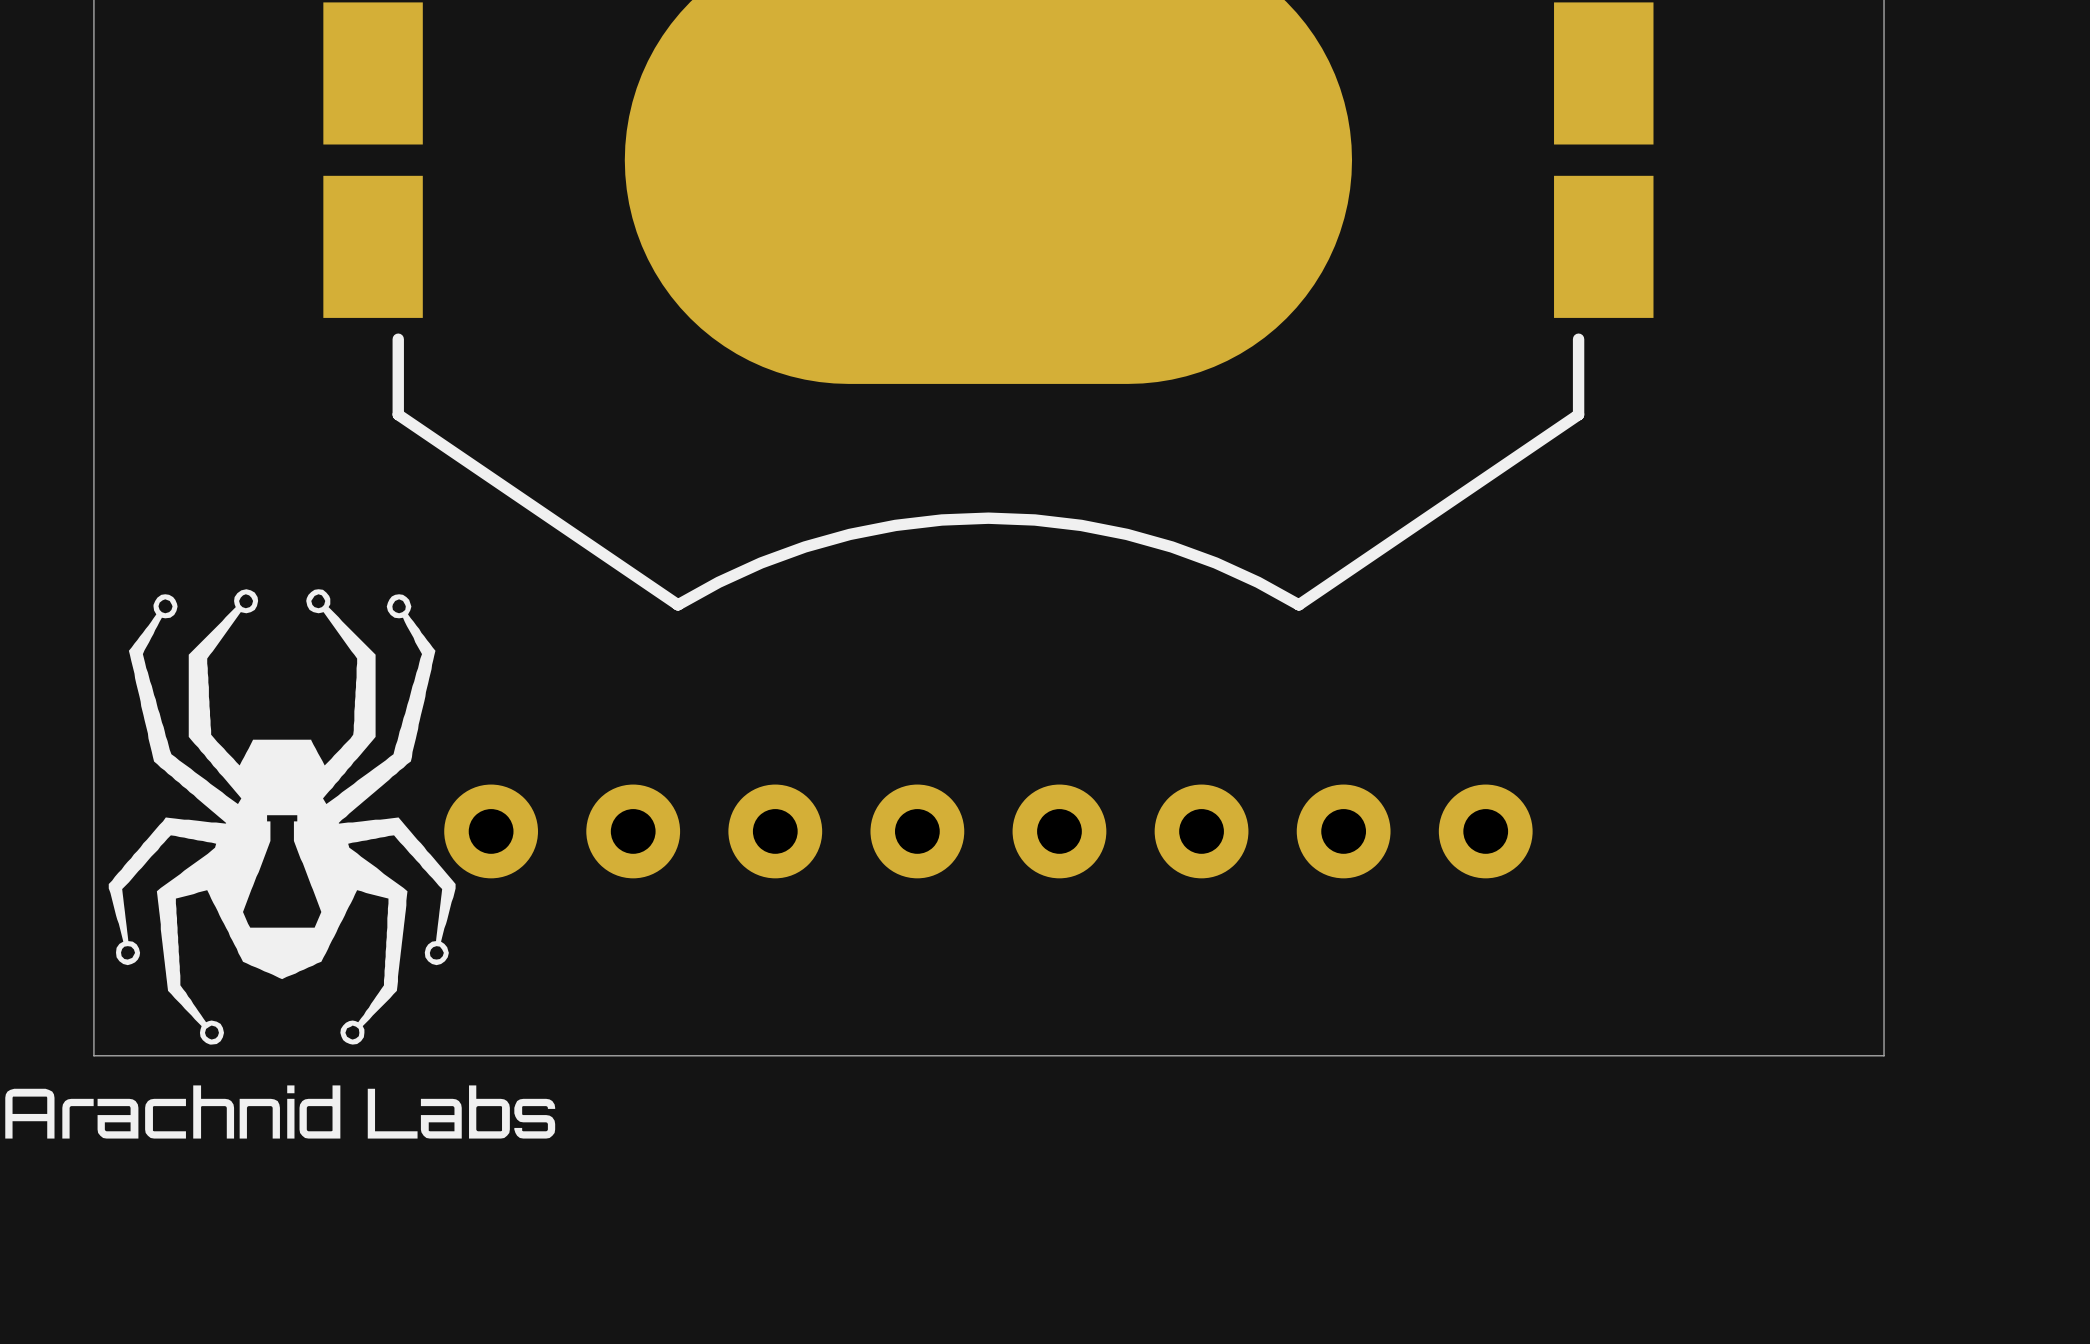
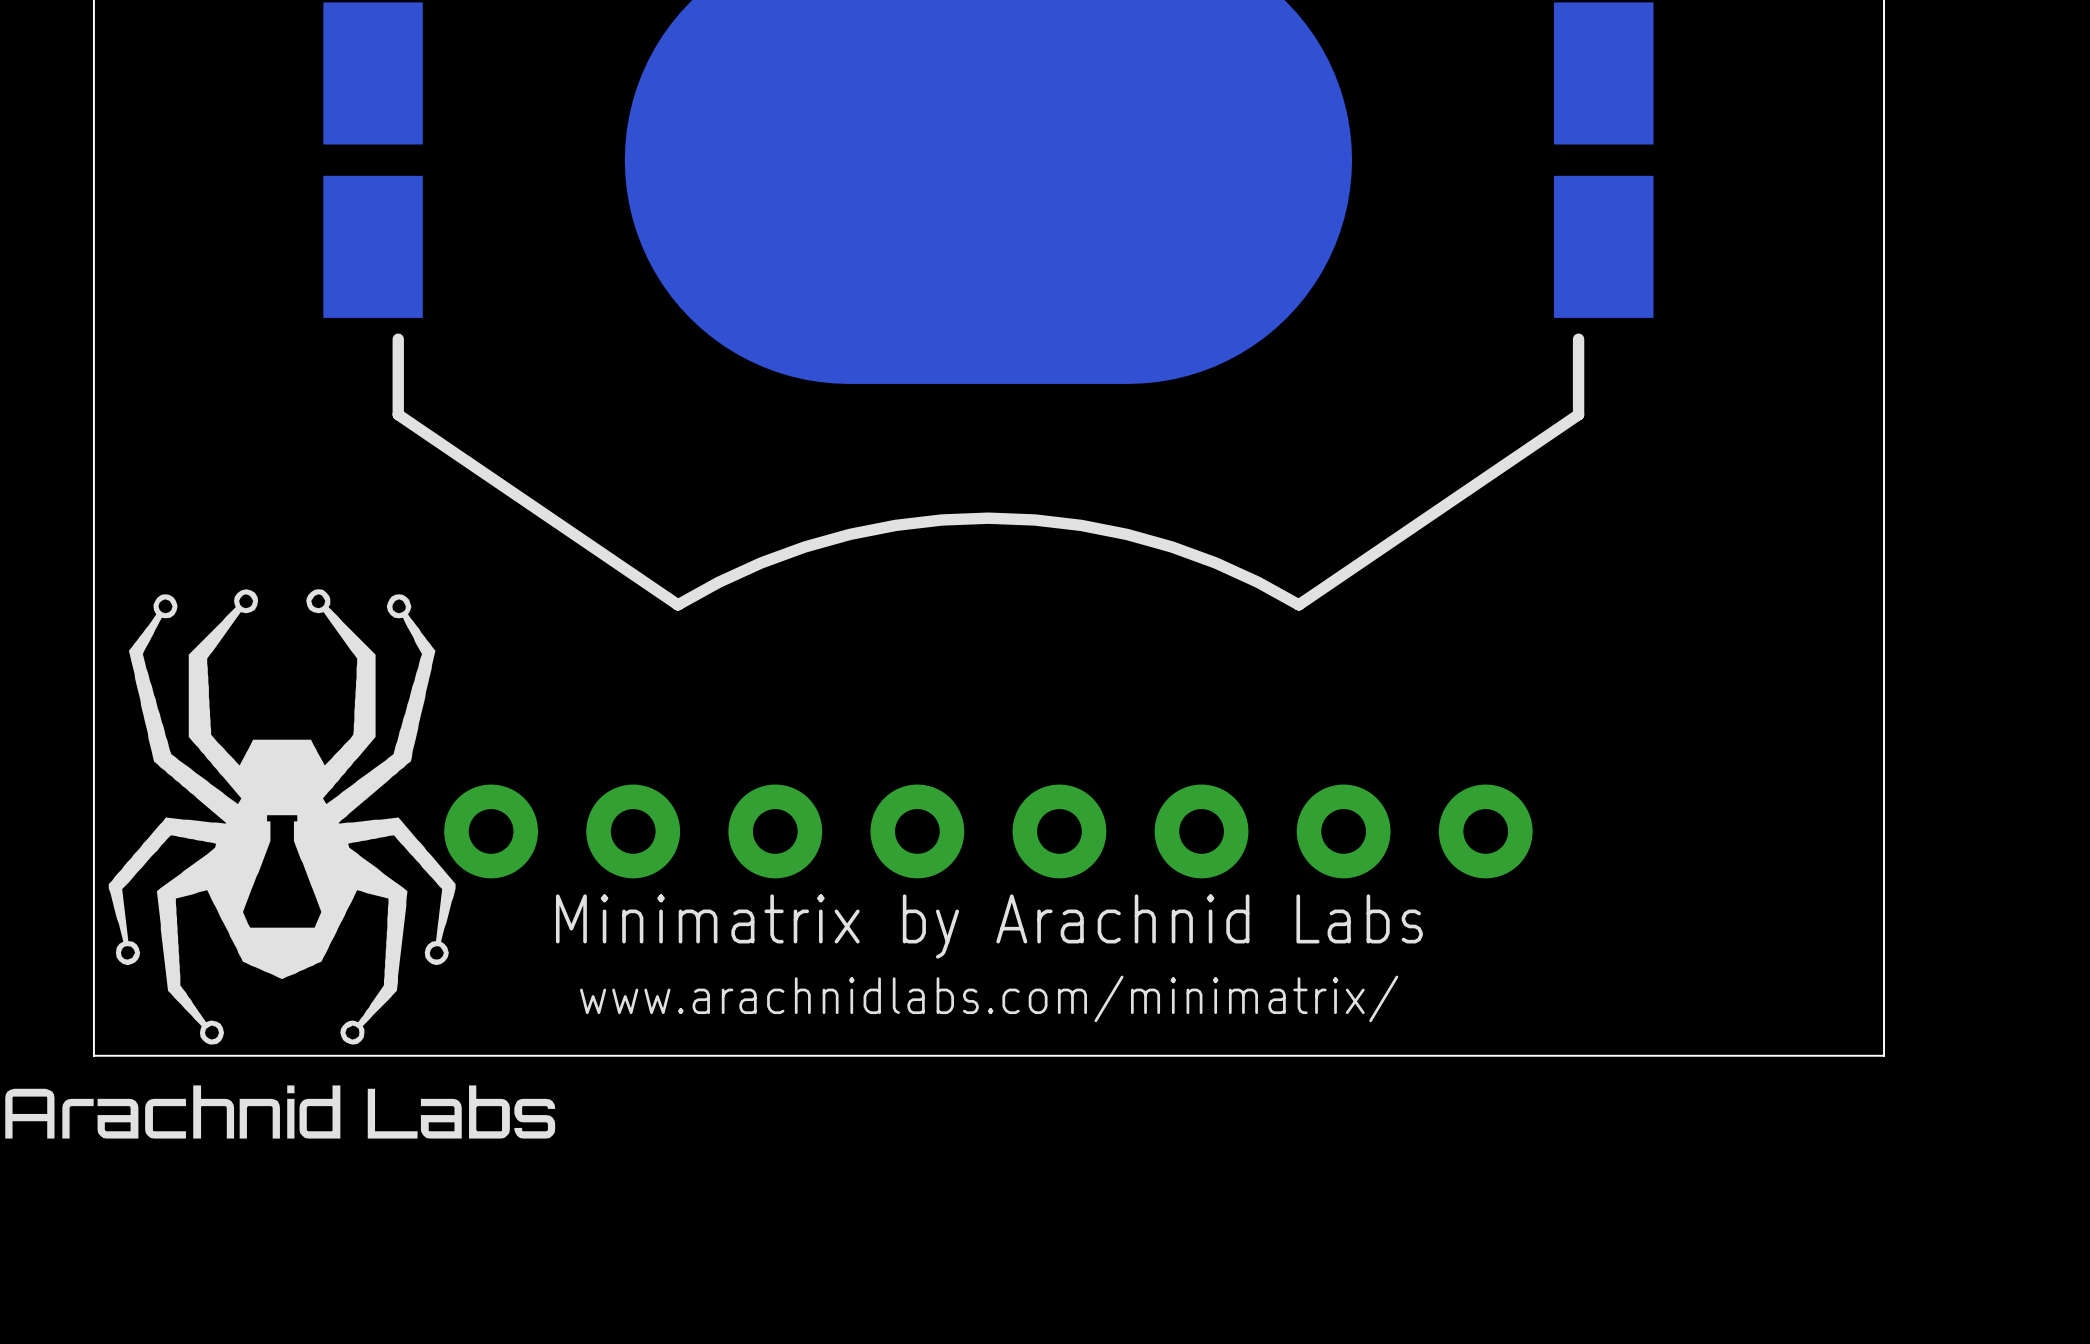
text: none -> Minimatrix by Arachnid Labs (989, 926)
text: none -> www.arachnidlabs.com/minimatrix/ (989, 998)

